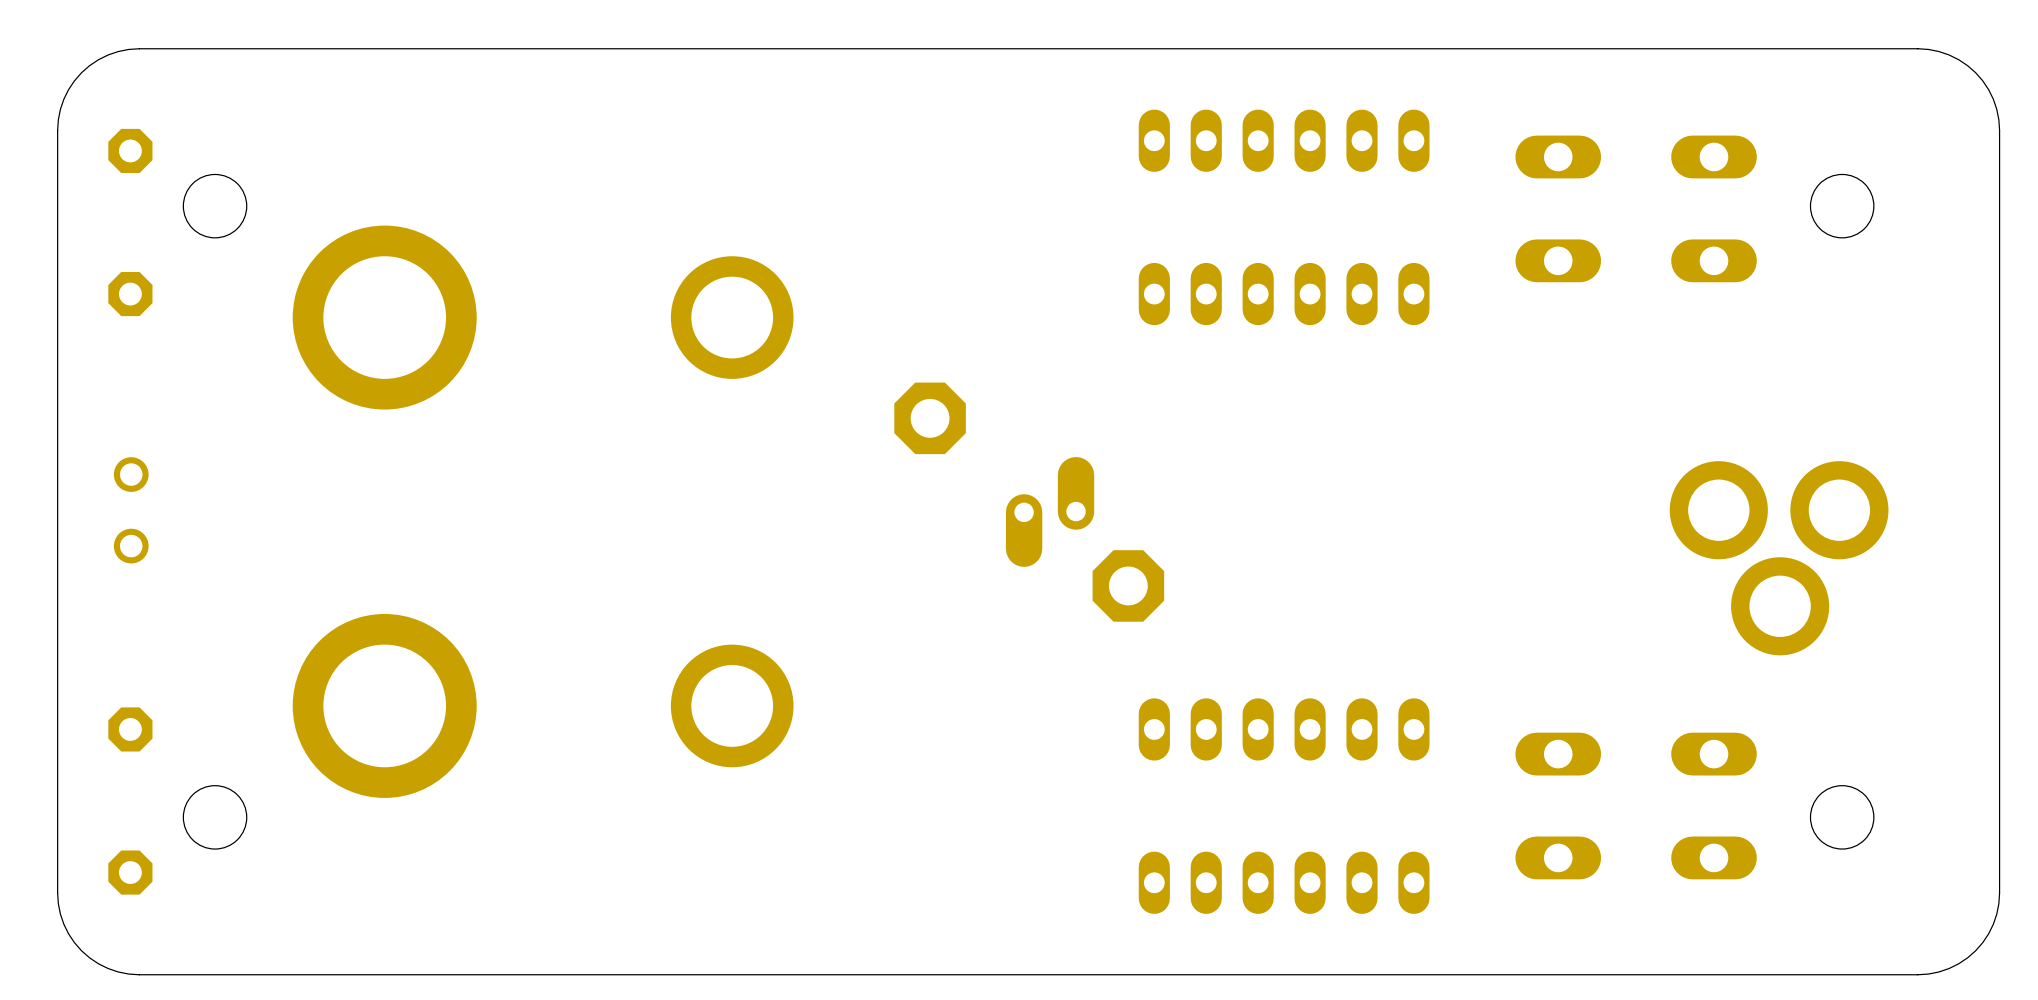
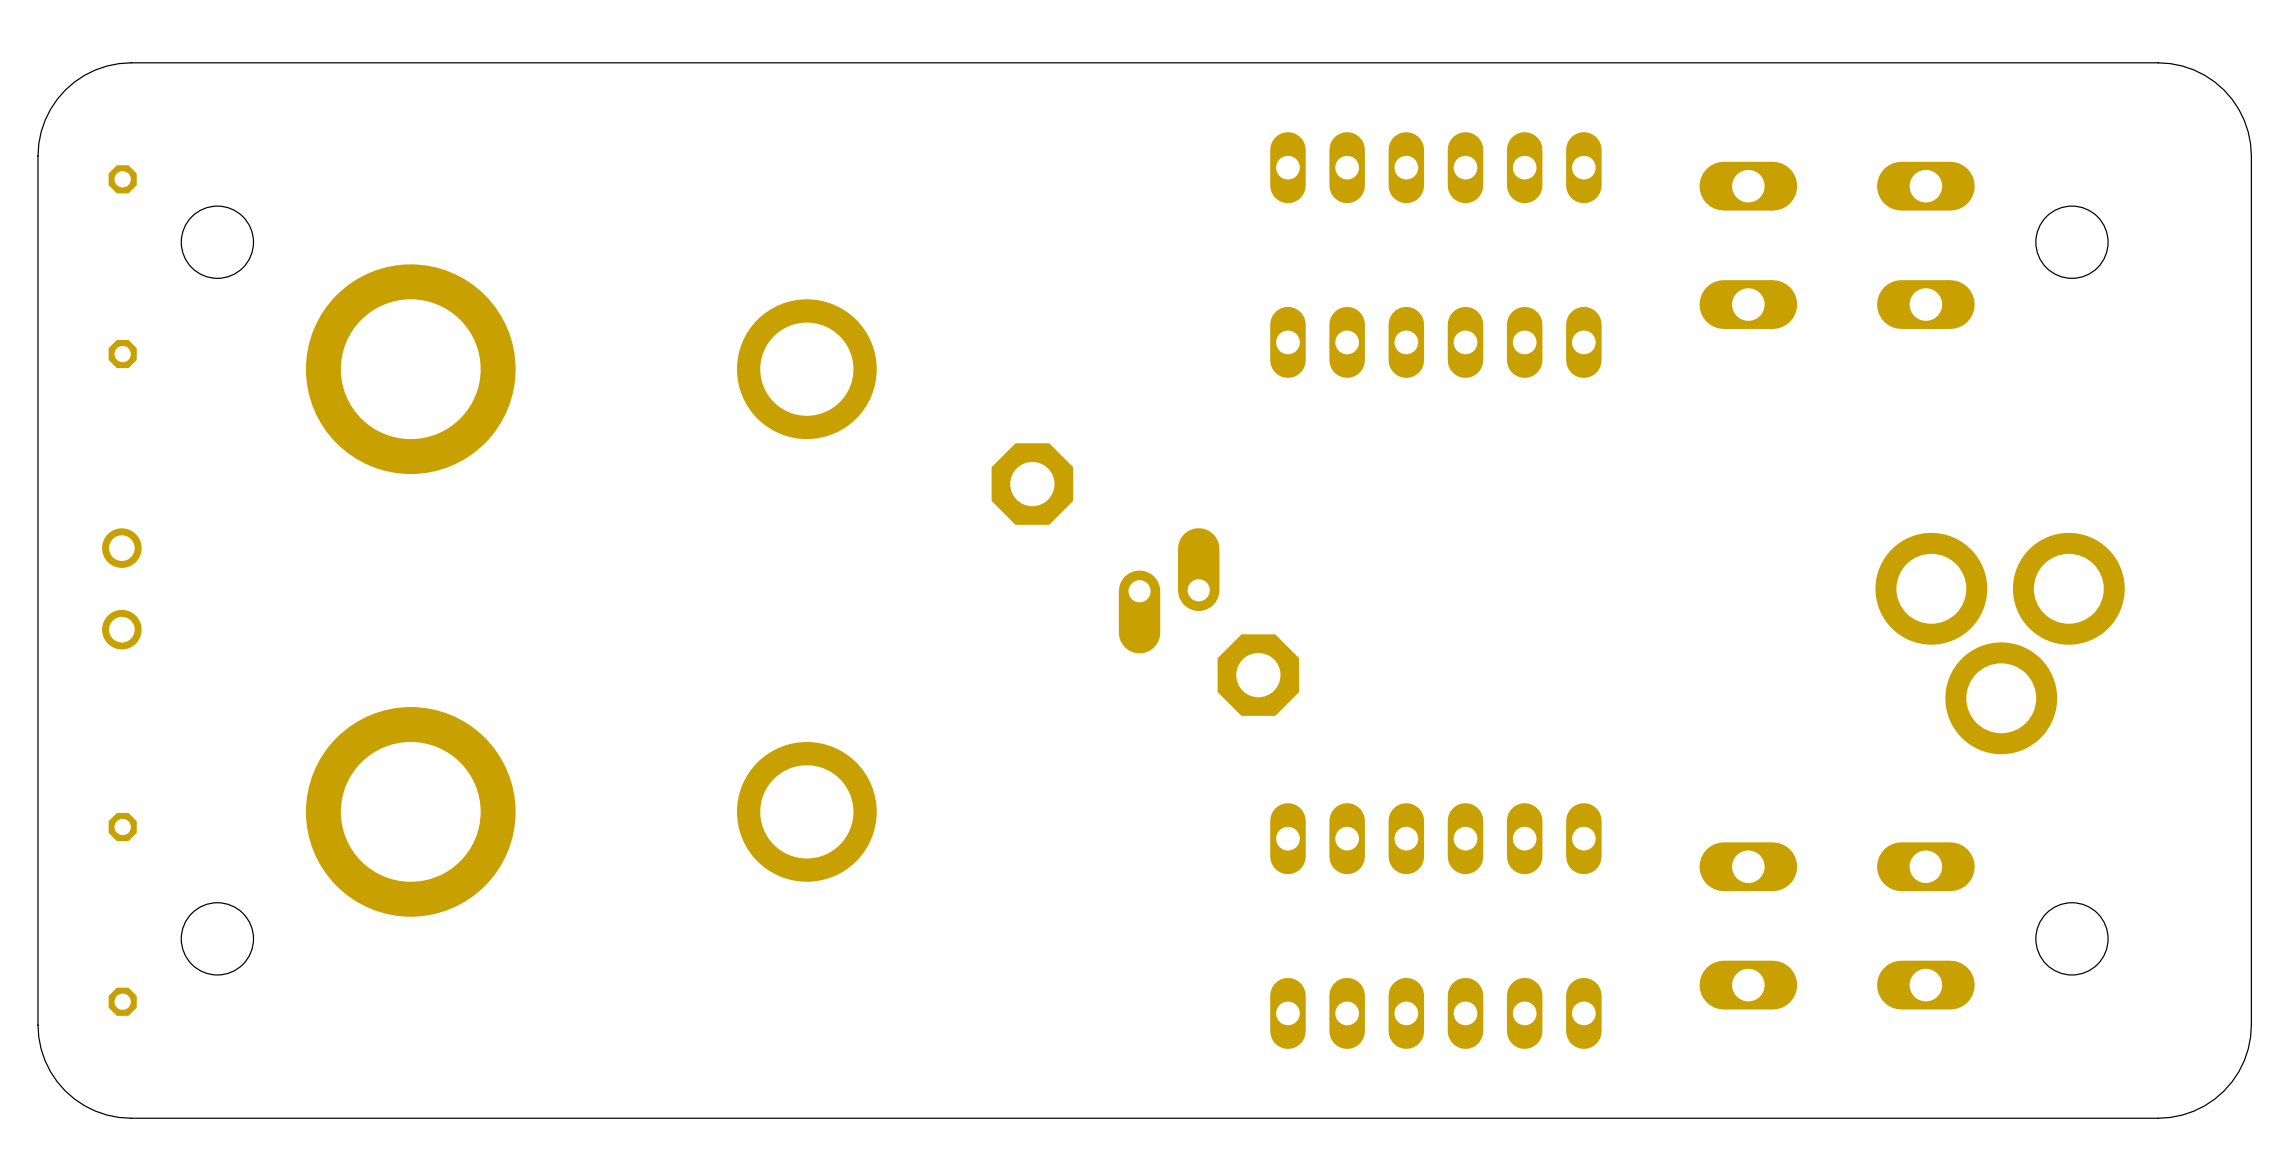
part footprint: [108, 128, 153, 174] -> [108, 165, 137, 194]
part footprint: [108, 271, 153, 317] -> [108, 339, 137, 369]
part footprint: [108, 707, 153, 752] -> [108, 812, 137, 842]
part footprint: [108, 850, 153, 895] -> [108, 987, 137, 1016]

